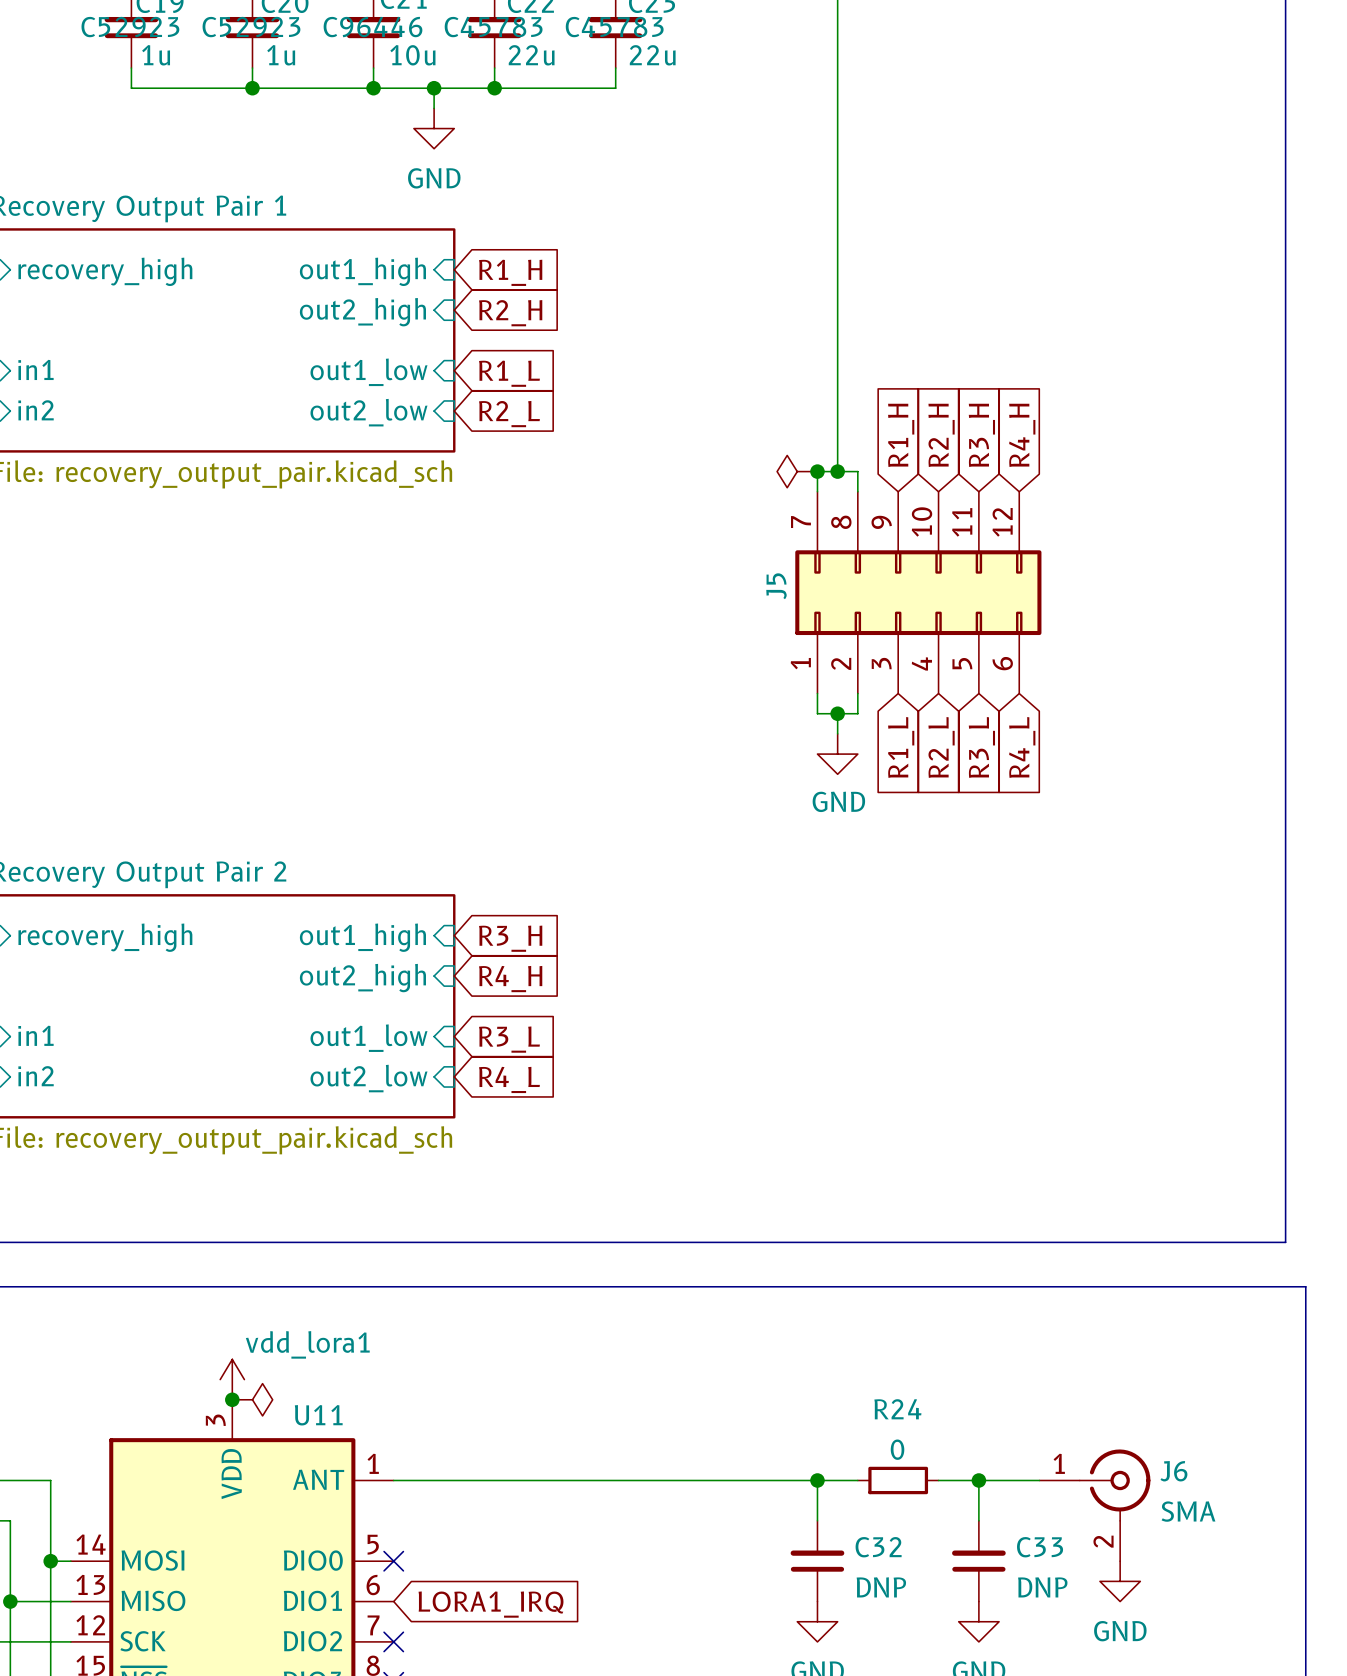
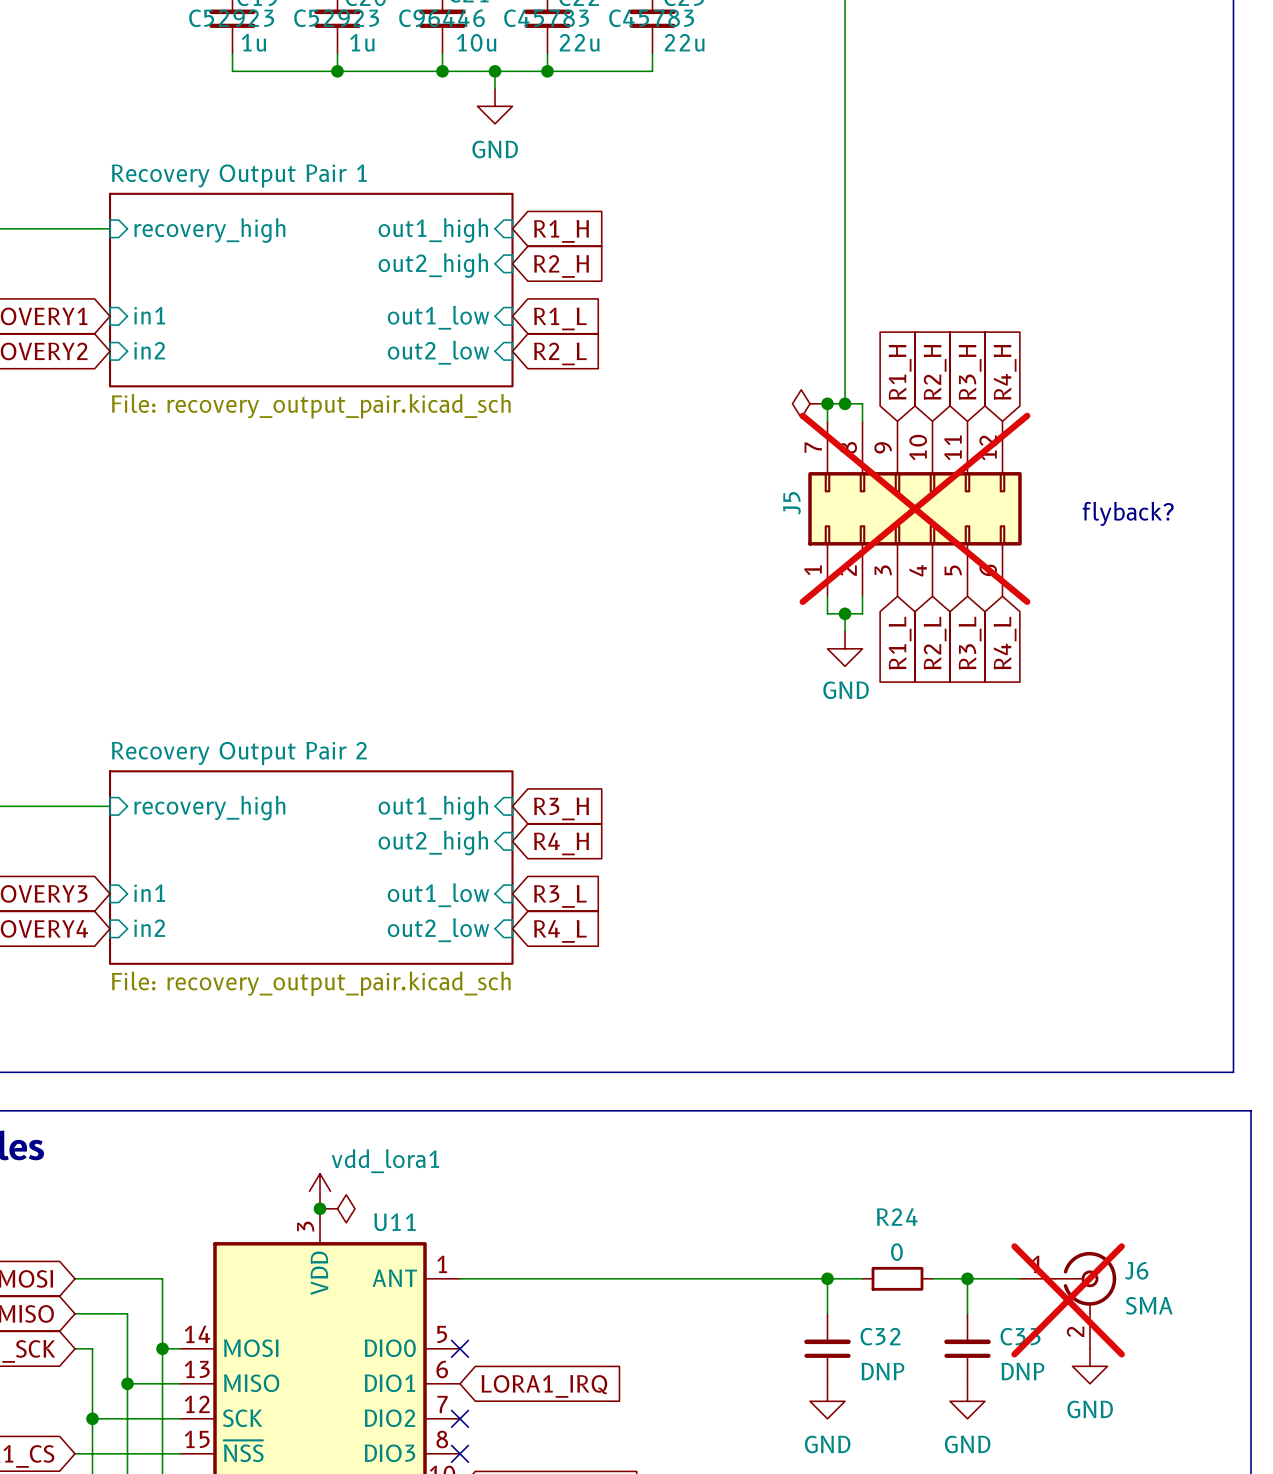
J5 do-not-place cross: none -> (914, 508)
text: none -> flyback? (1128, 513)
J6 do-not-place cross: none -> (1068, 1300)

